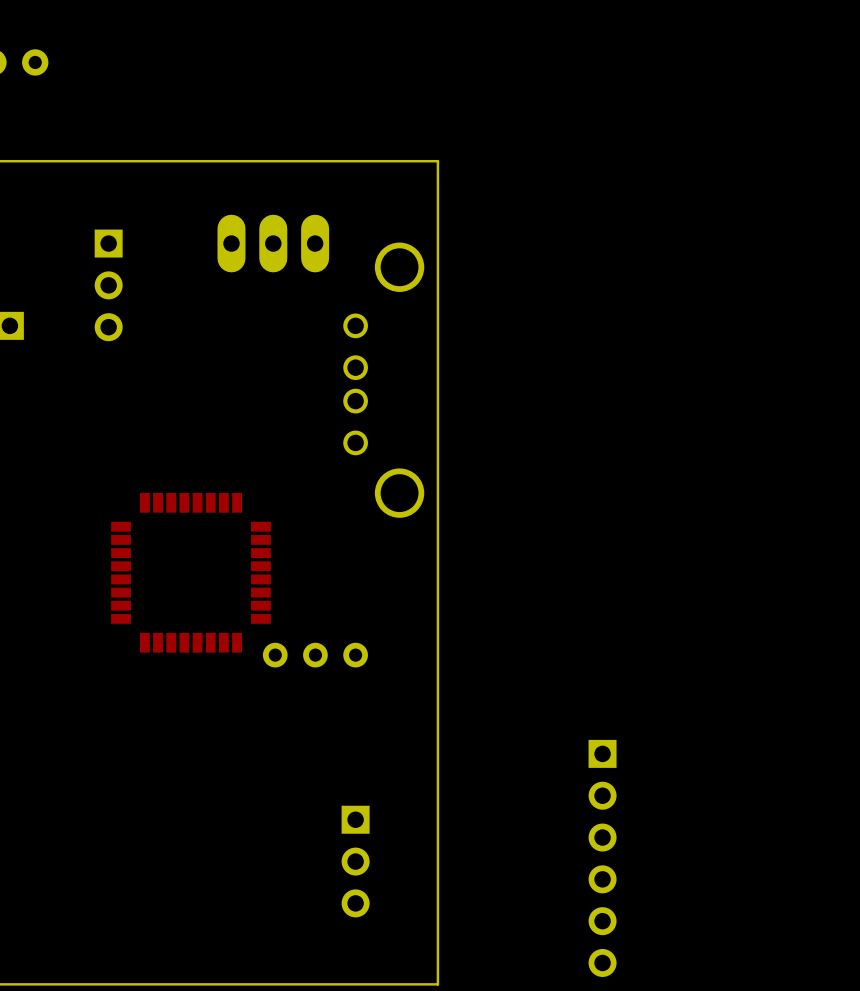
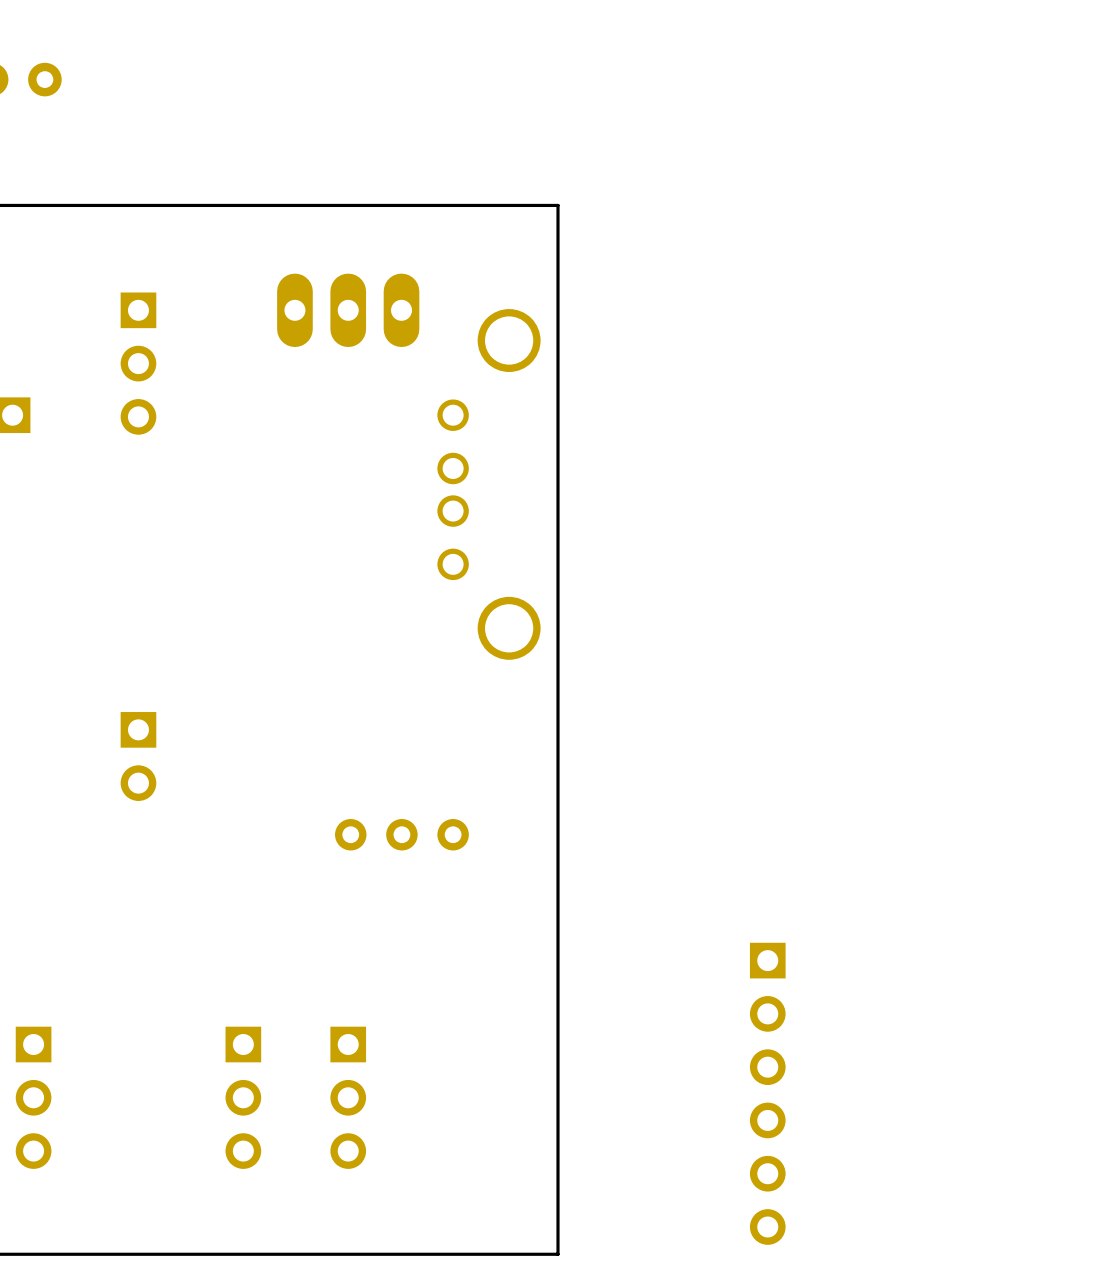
part: (190, 572) -> none
part: none -> (138, 756)
part: none -> (33, 1097)
part: none -> (243, 1097)
part: none -> (348, 1097)
part: (355, 861) -> none

